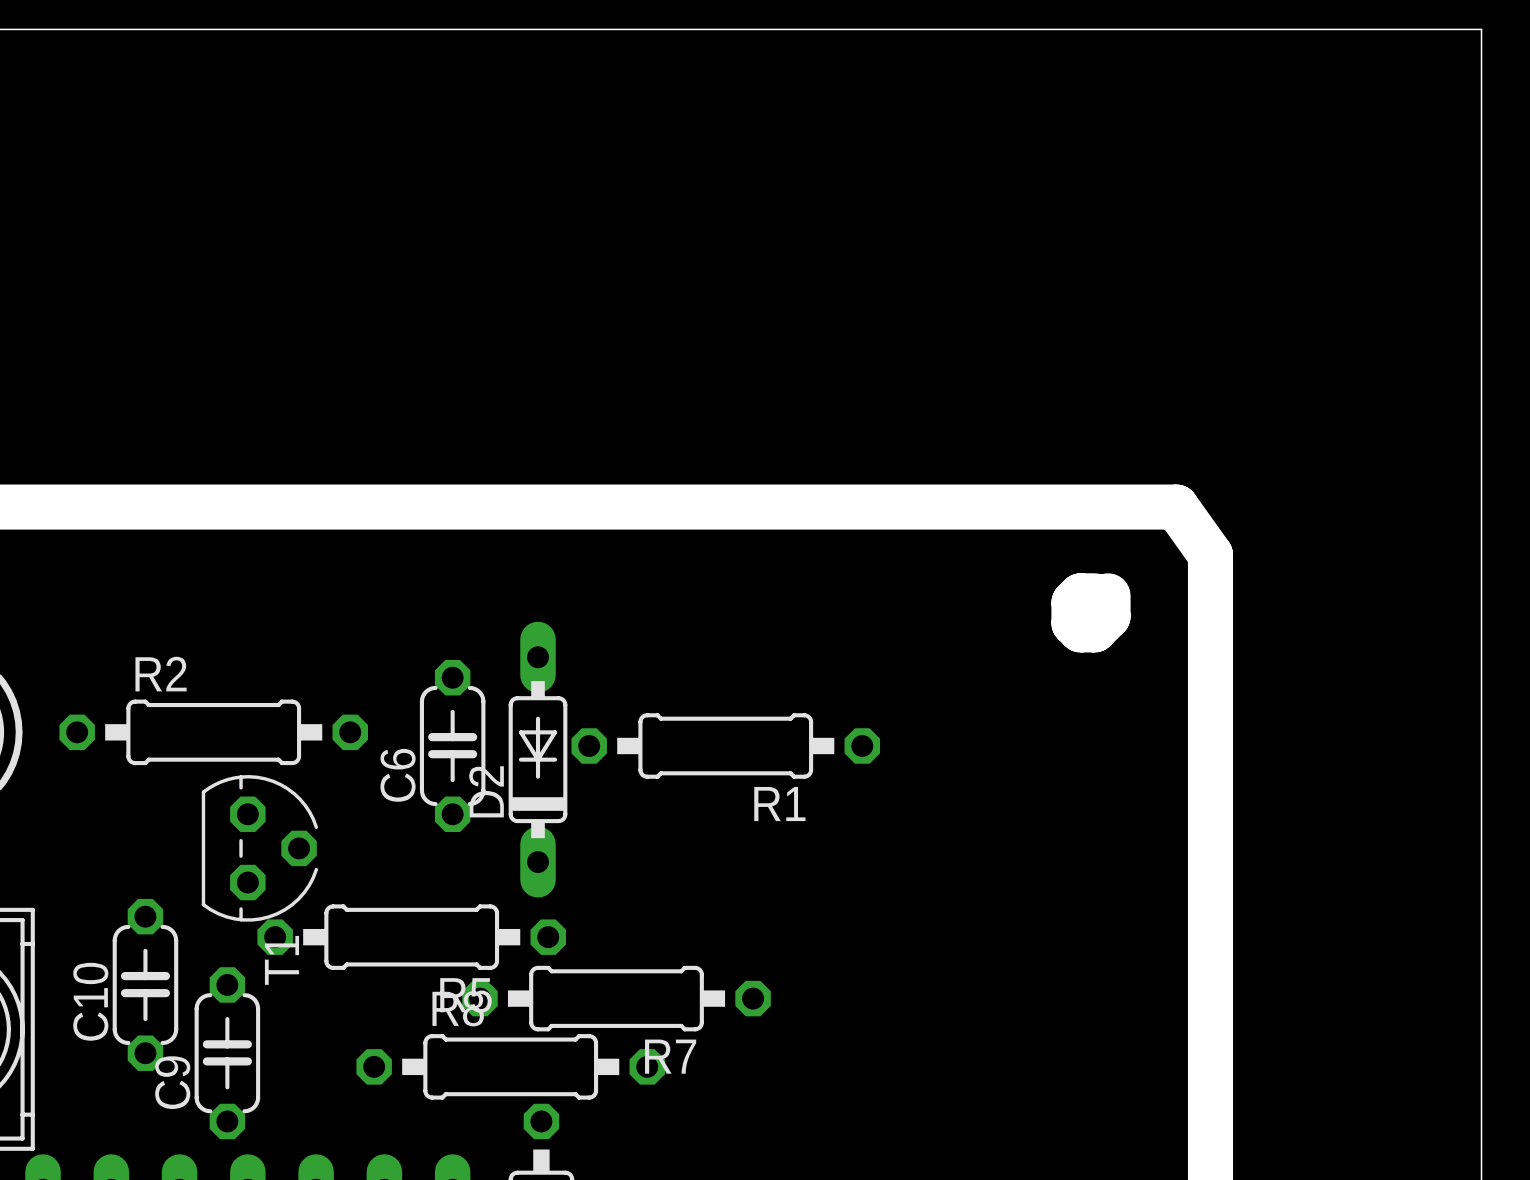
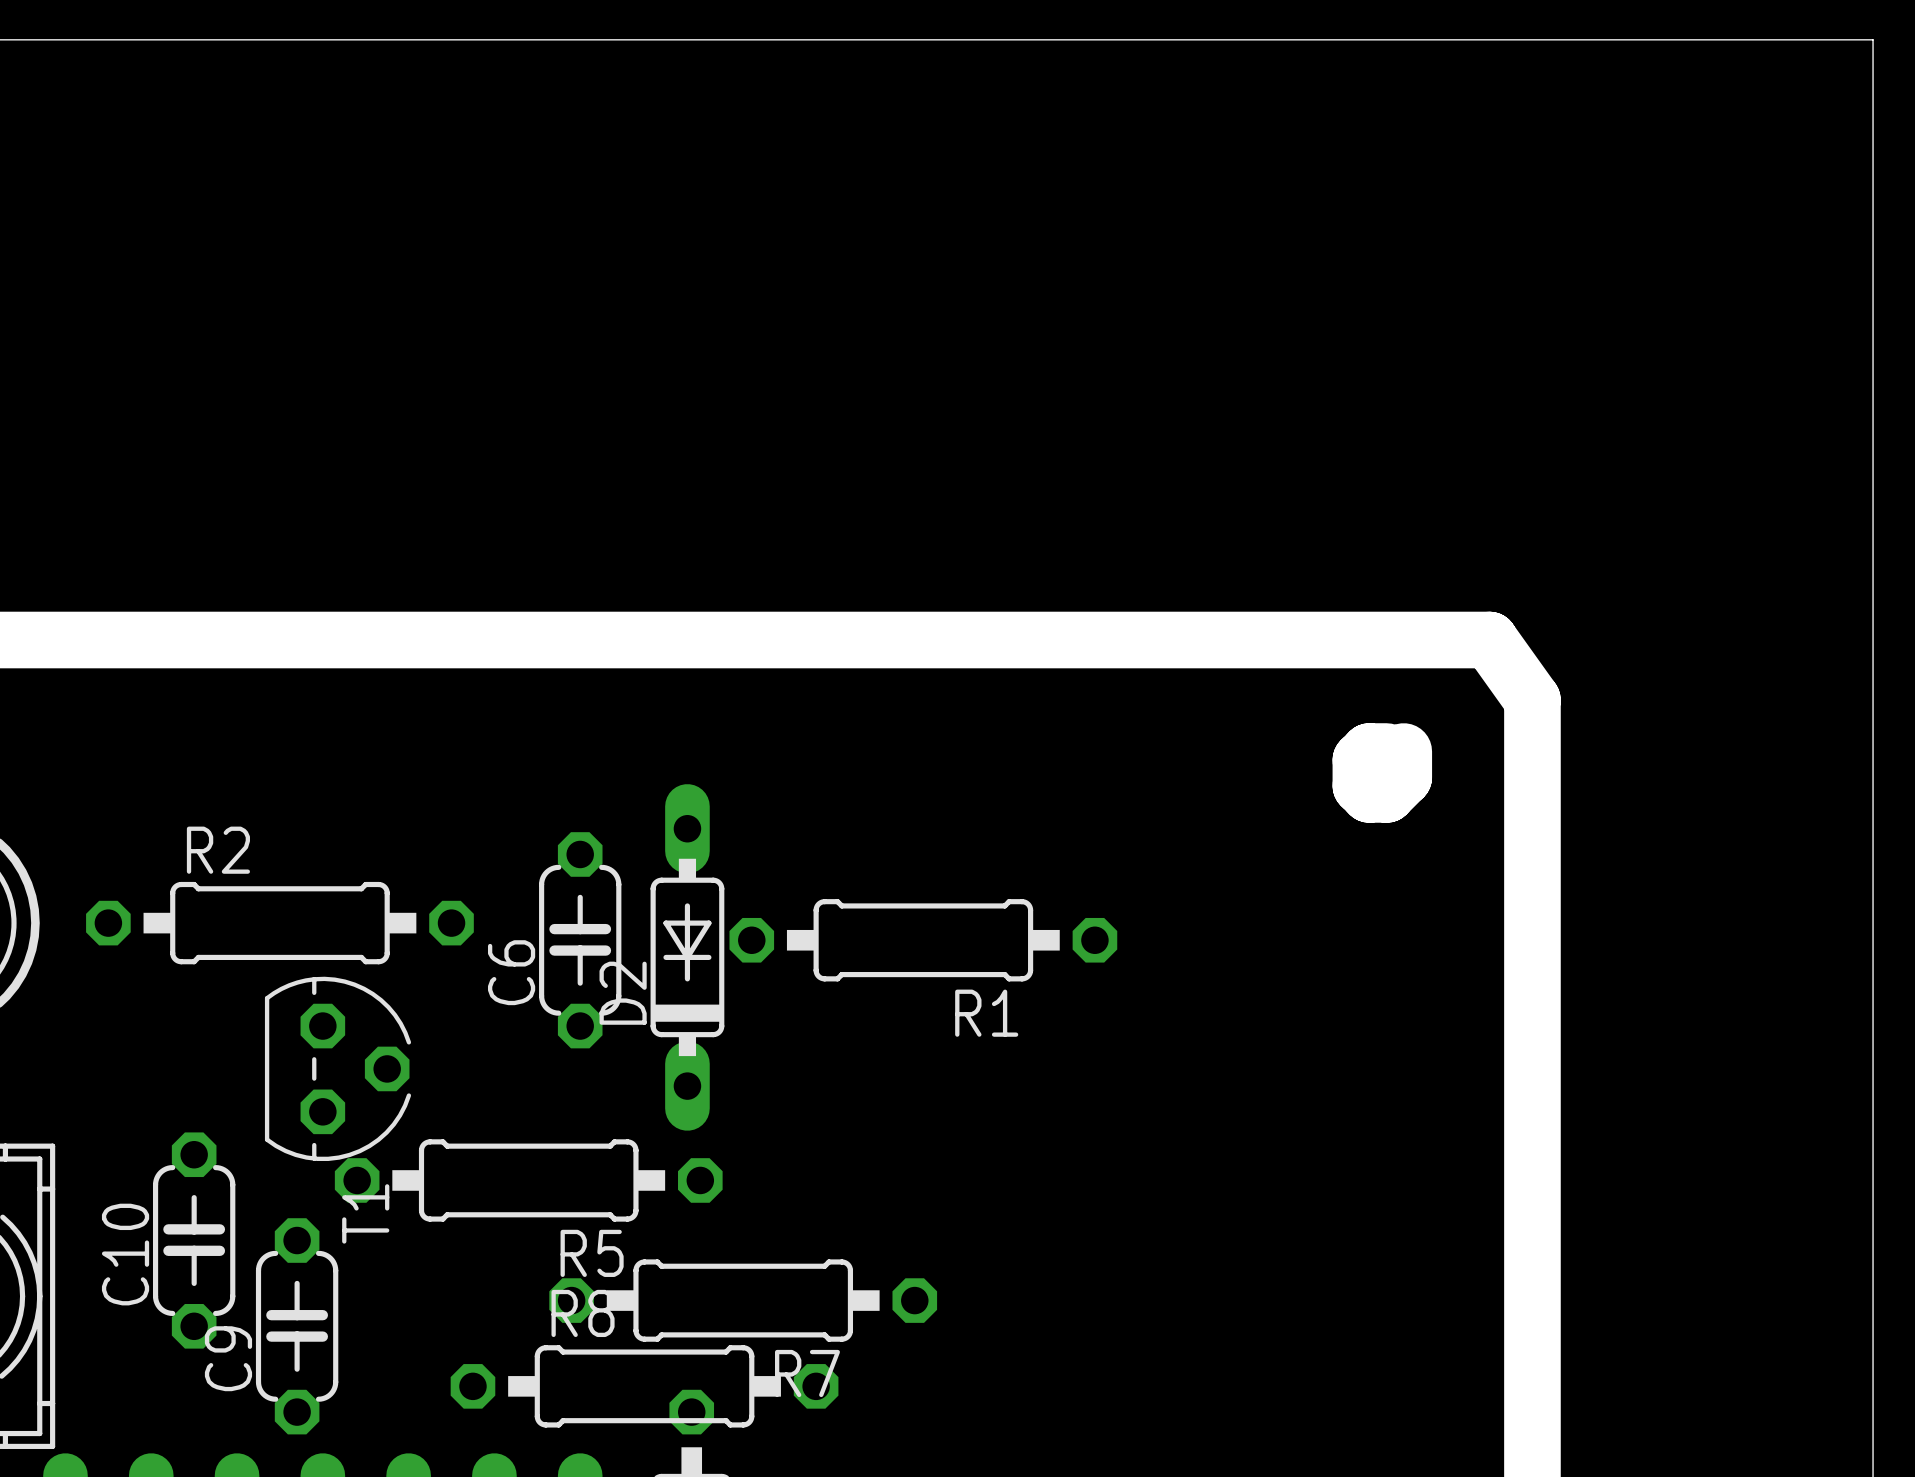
R7 position: (616, 998) -> (743, 1300)
R8 position: (510, 1066) -> (644, 1386)

